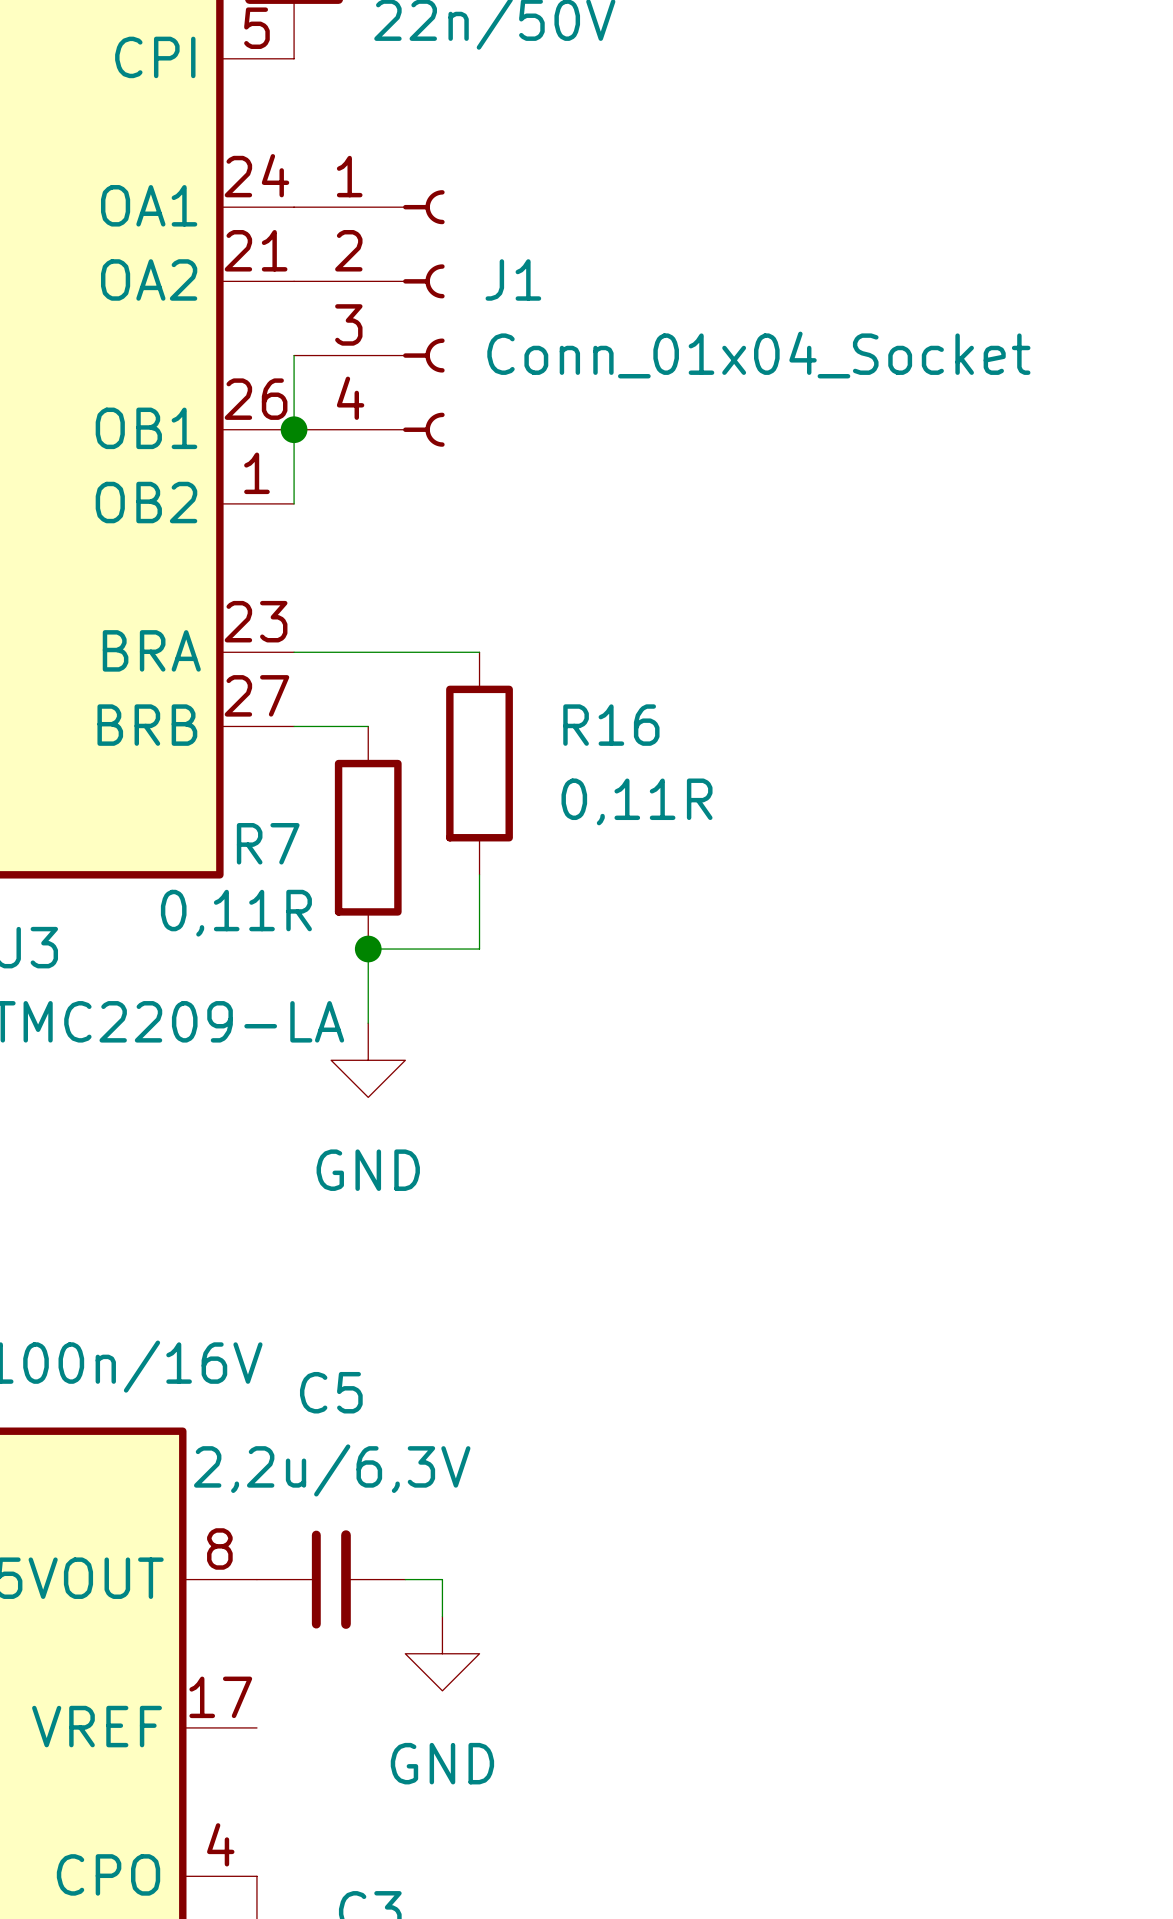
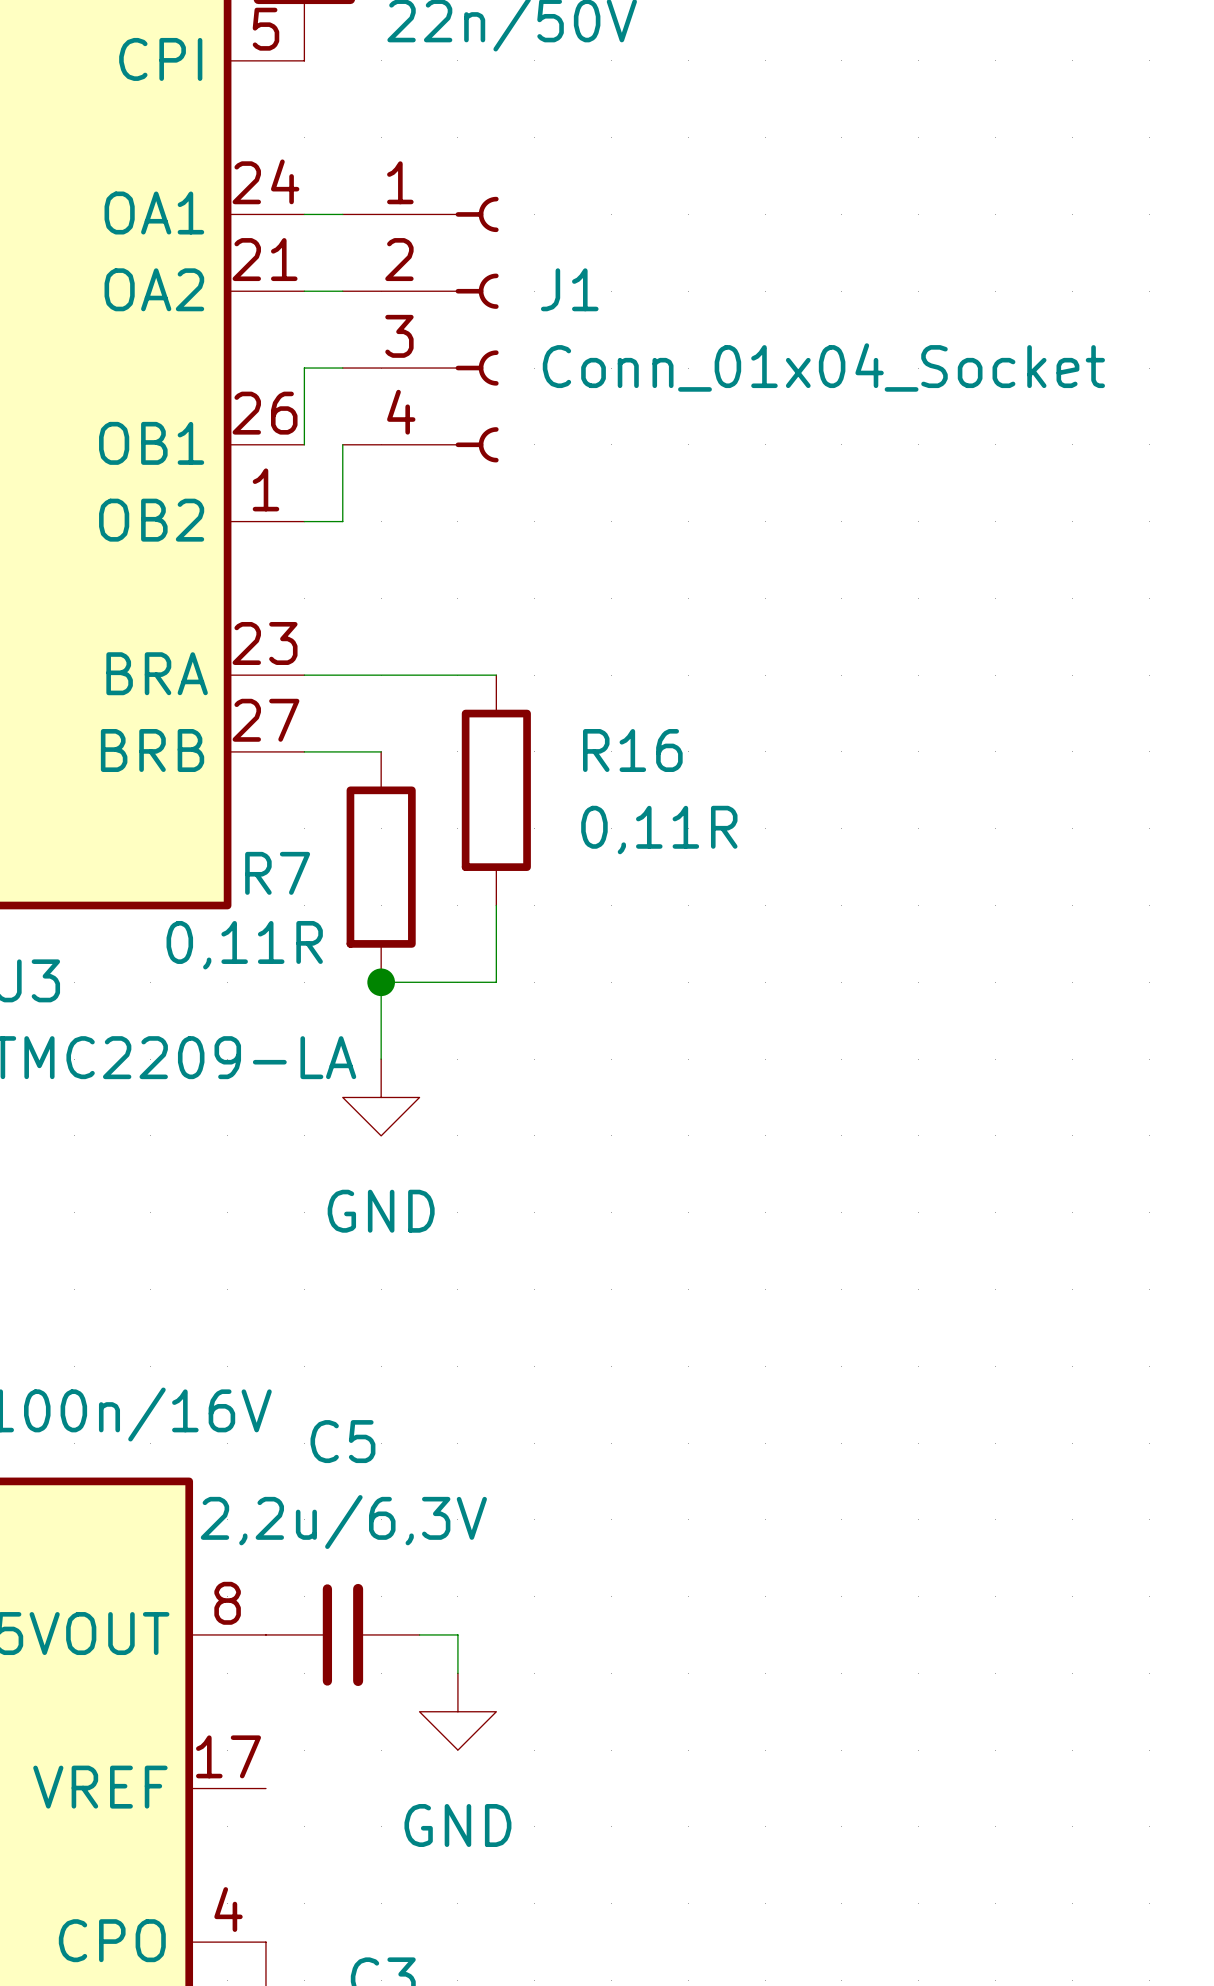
J1 position: (369, 318) -> (420, 329)
wire: (294, 429) (294, 503) -> (342, 444) (342, 521) (304, 521)
junction: (294, 429) -> none

